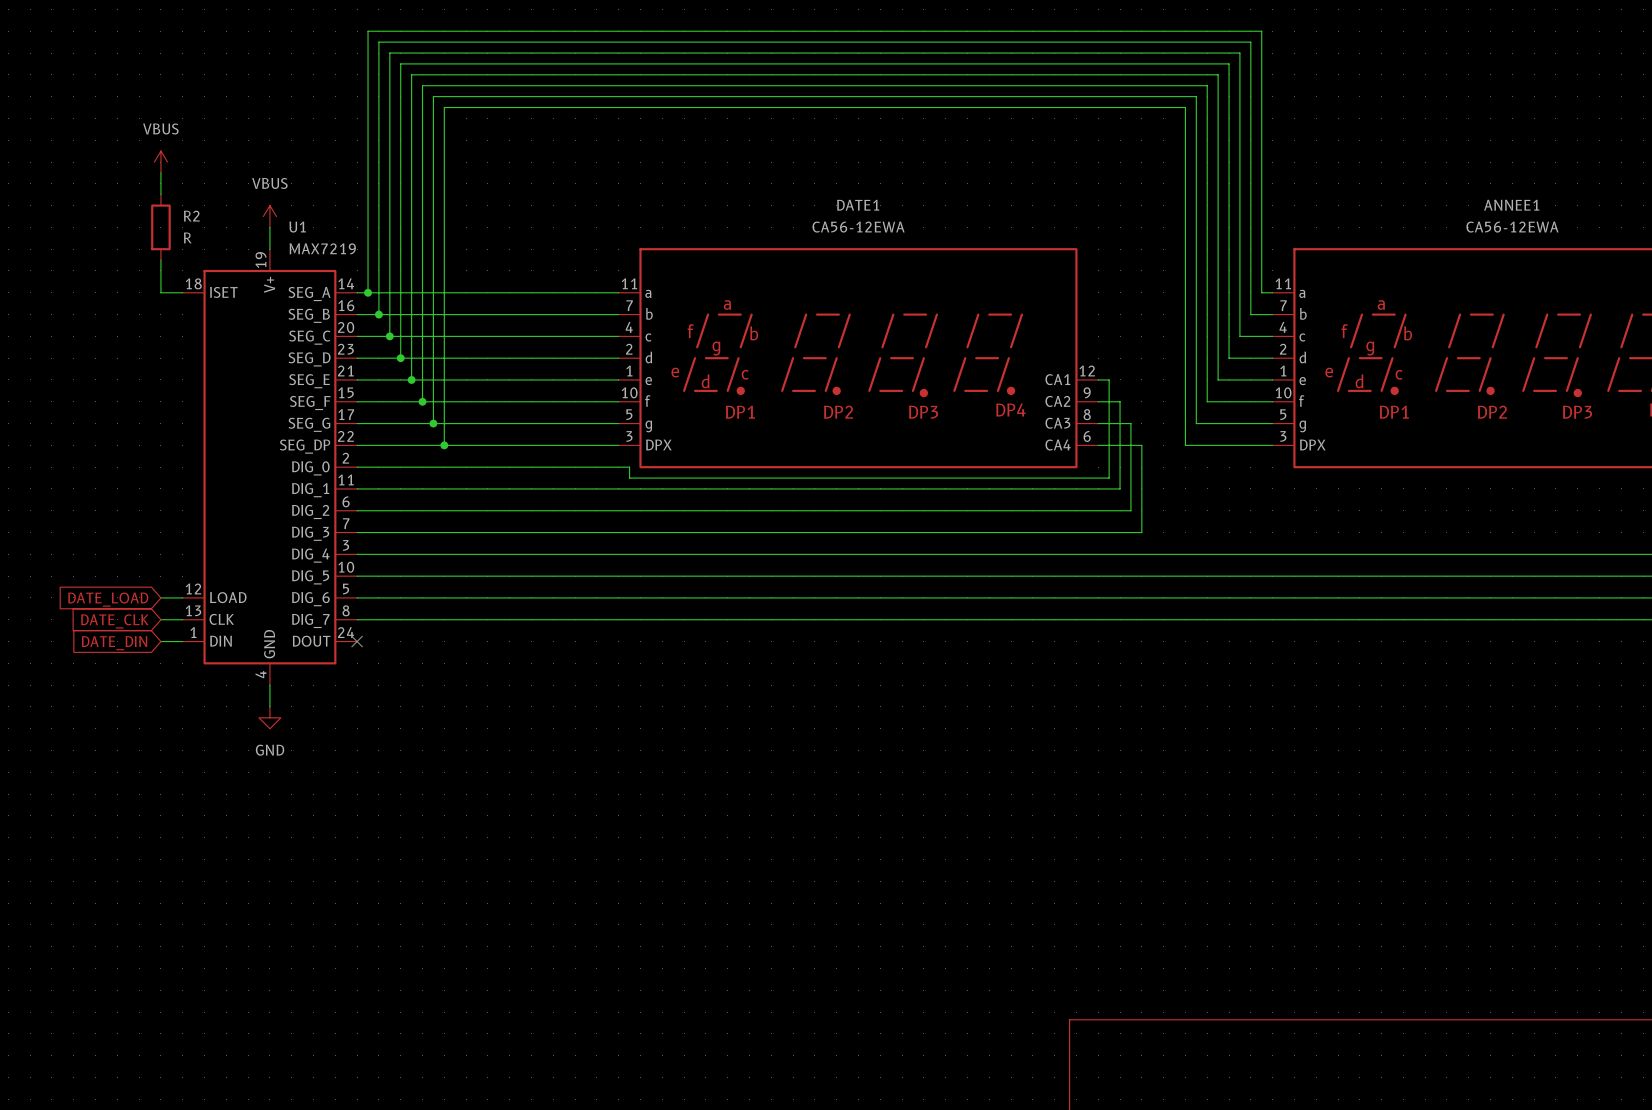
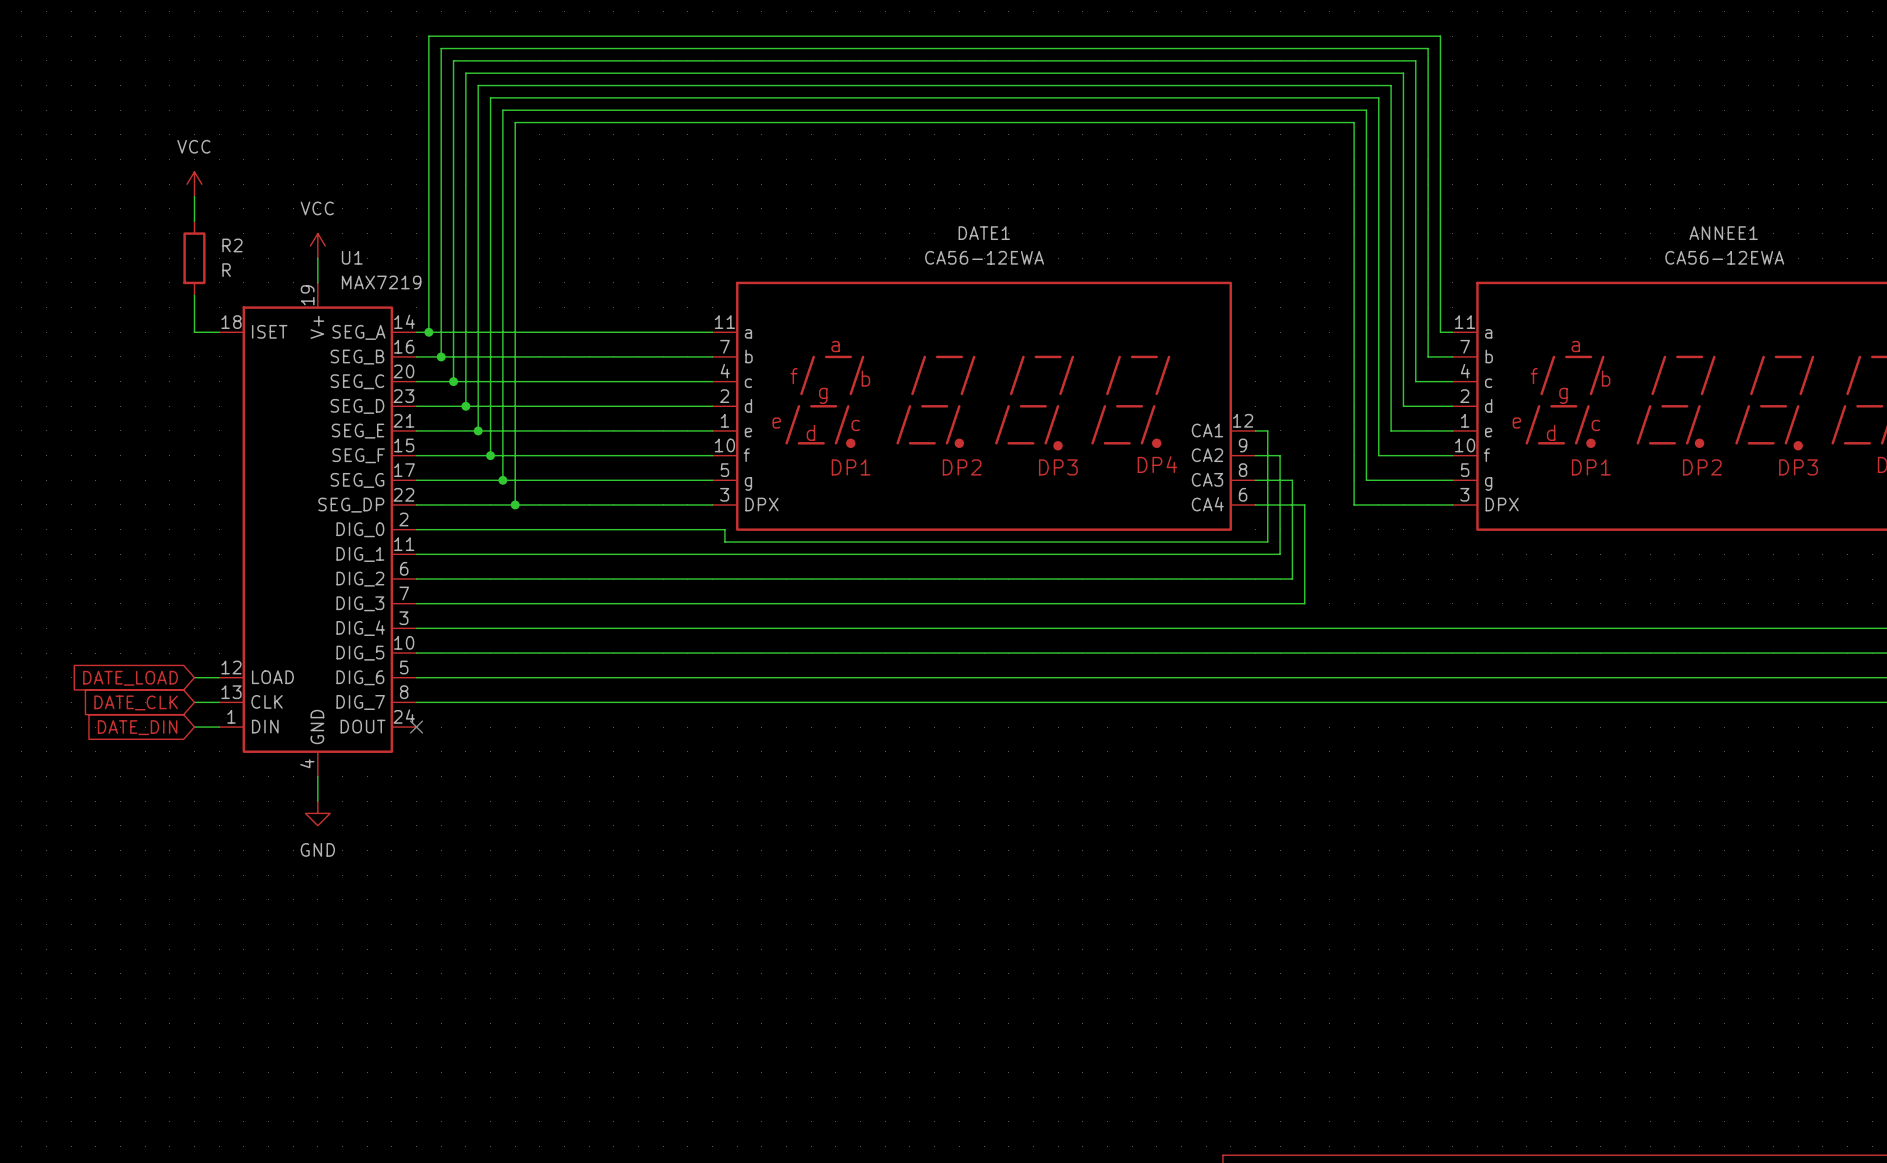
power symbol: VBUS (160, 162) -> VCC (194, 184)
power symbol: VBUS (269, 216) -> VCC (317, 245)

